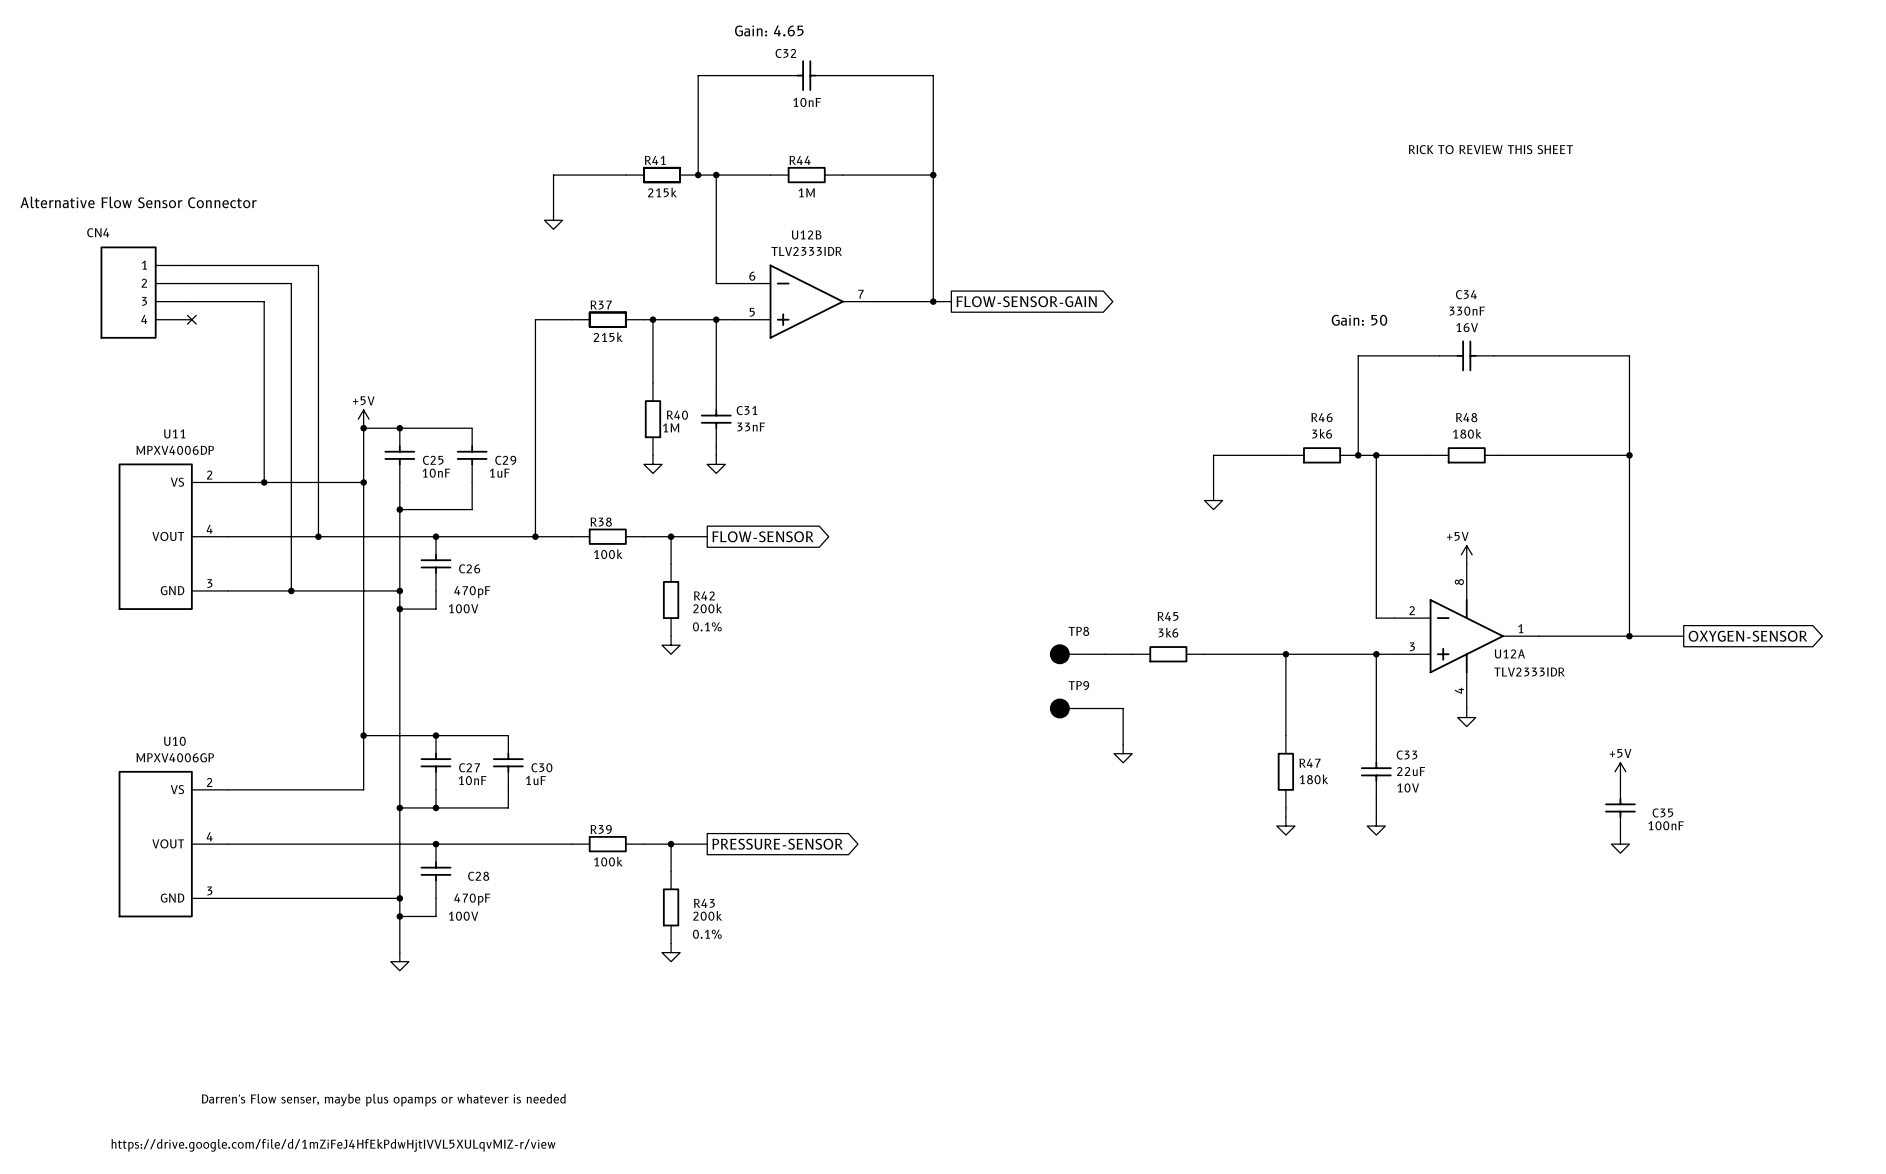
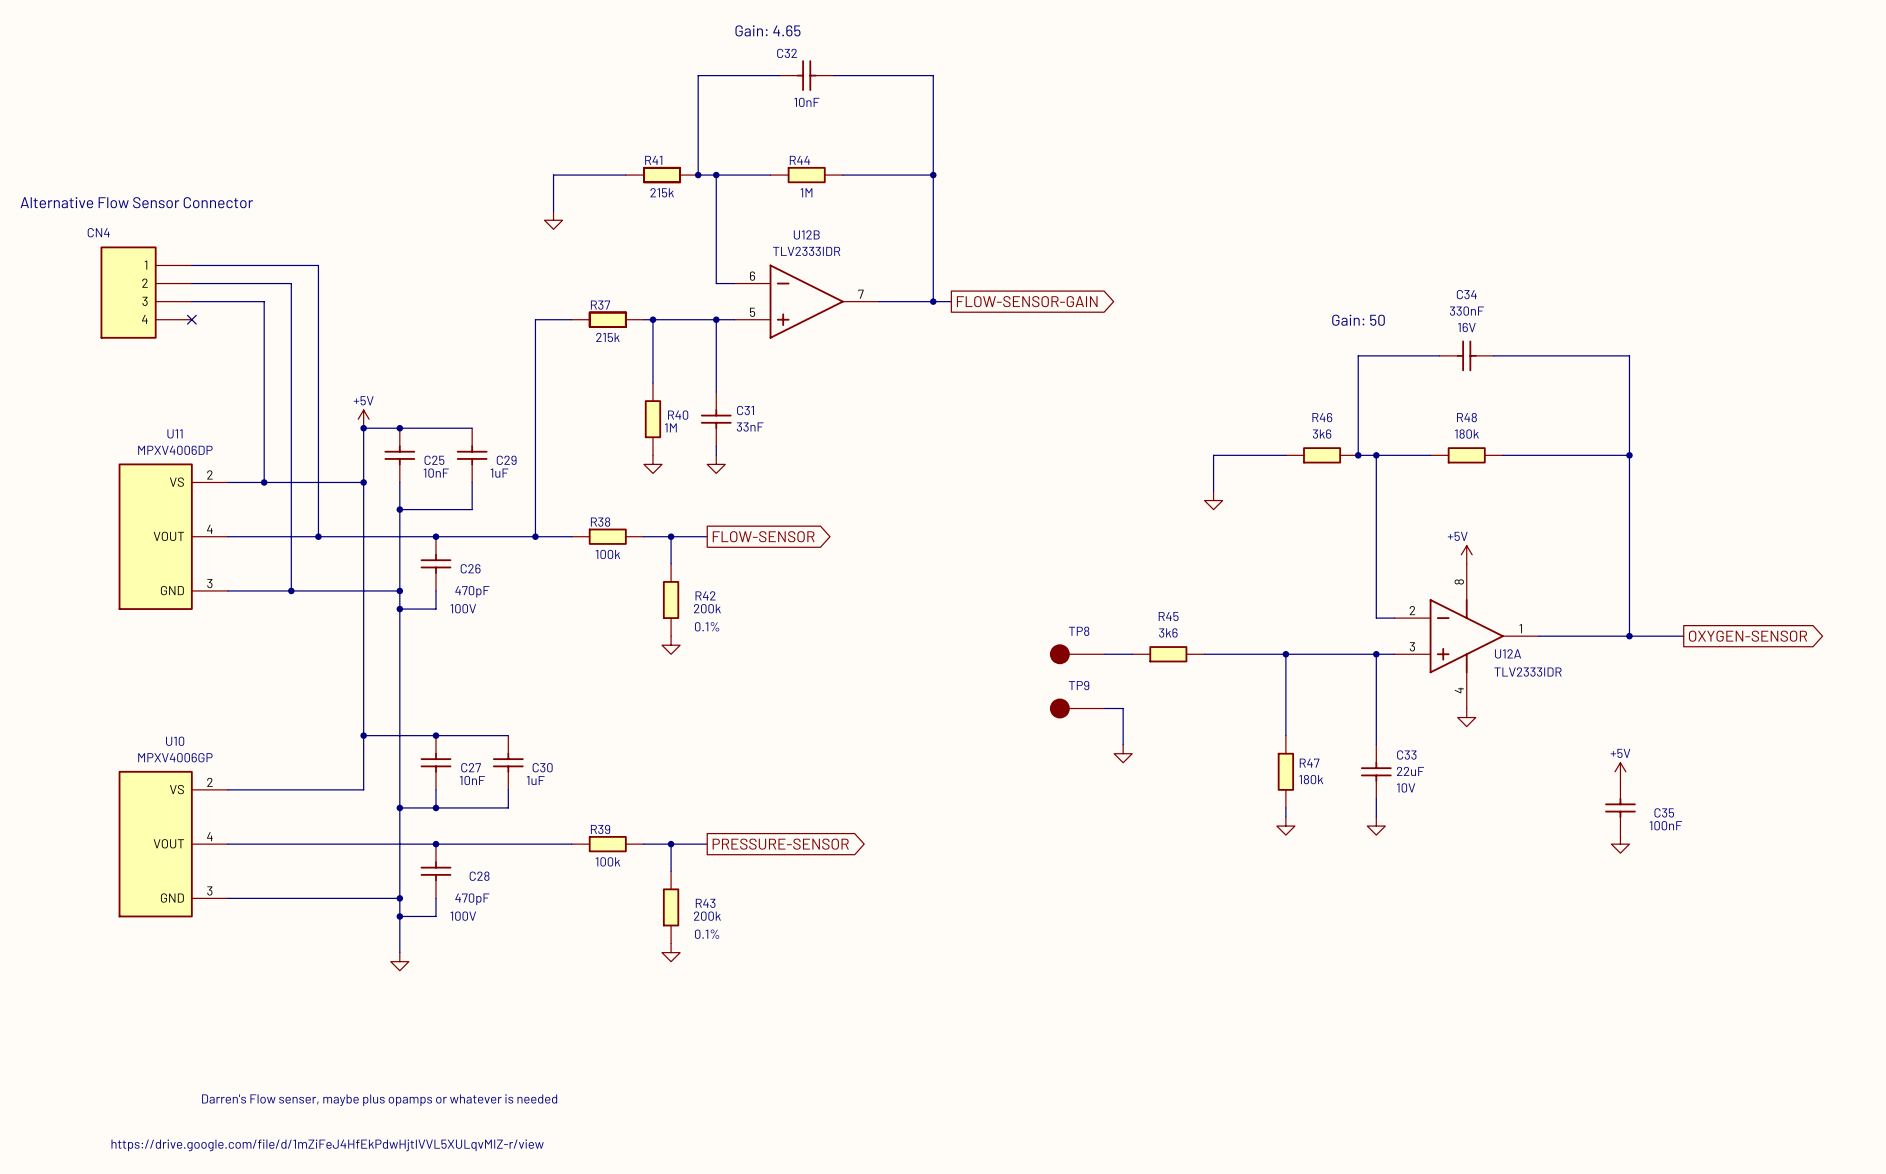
text: RICK TO REVIEW THIS SHEET (1490, 149) -> none

